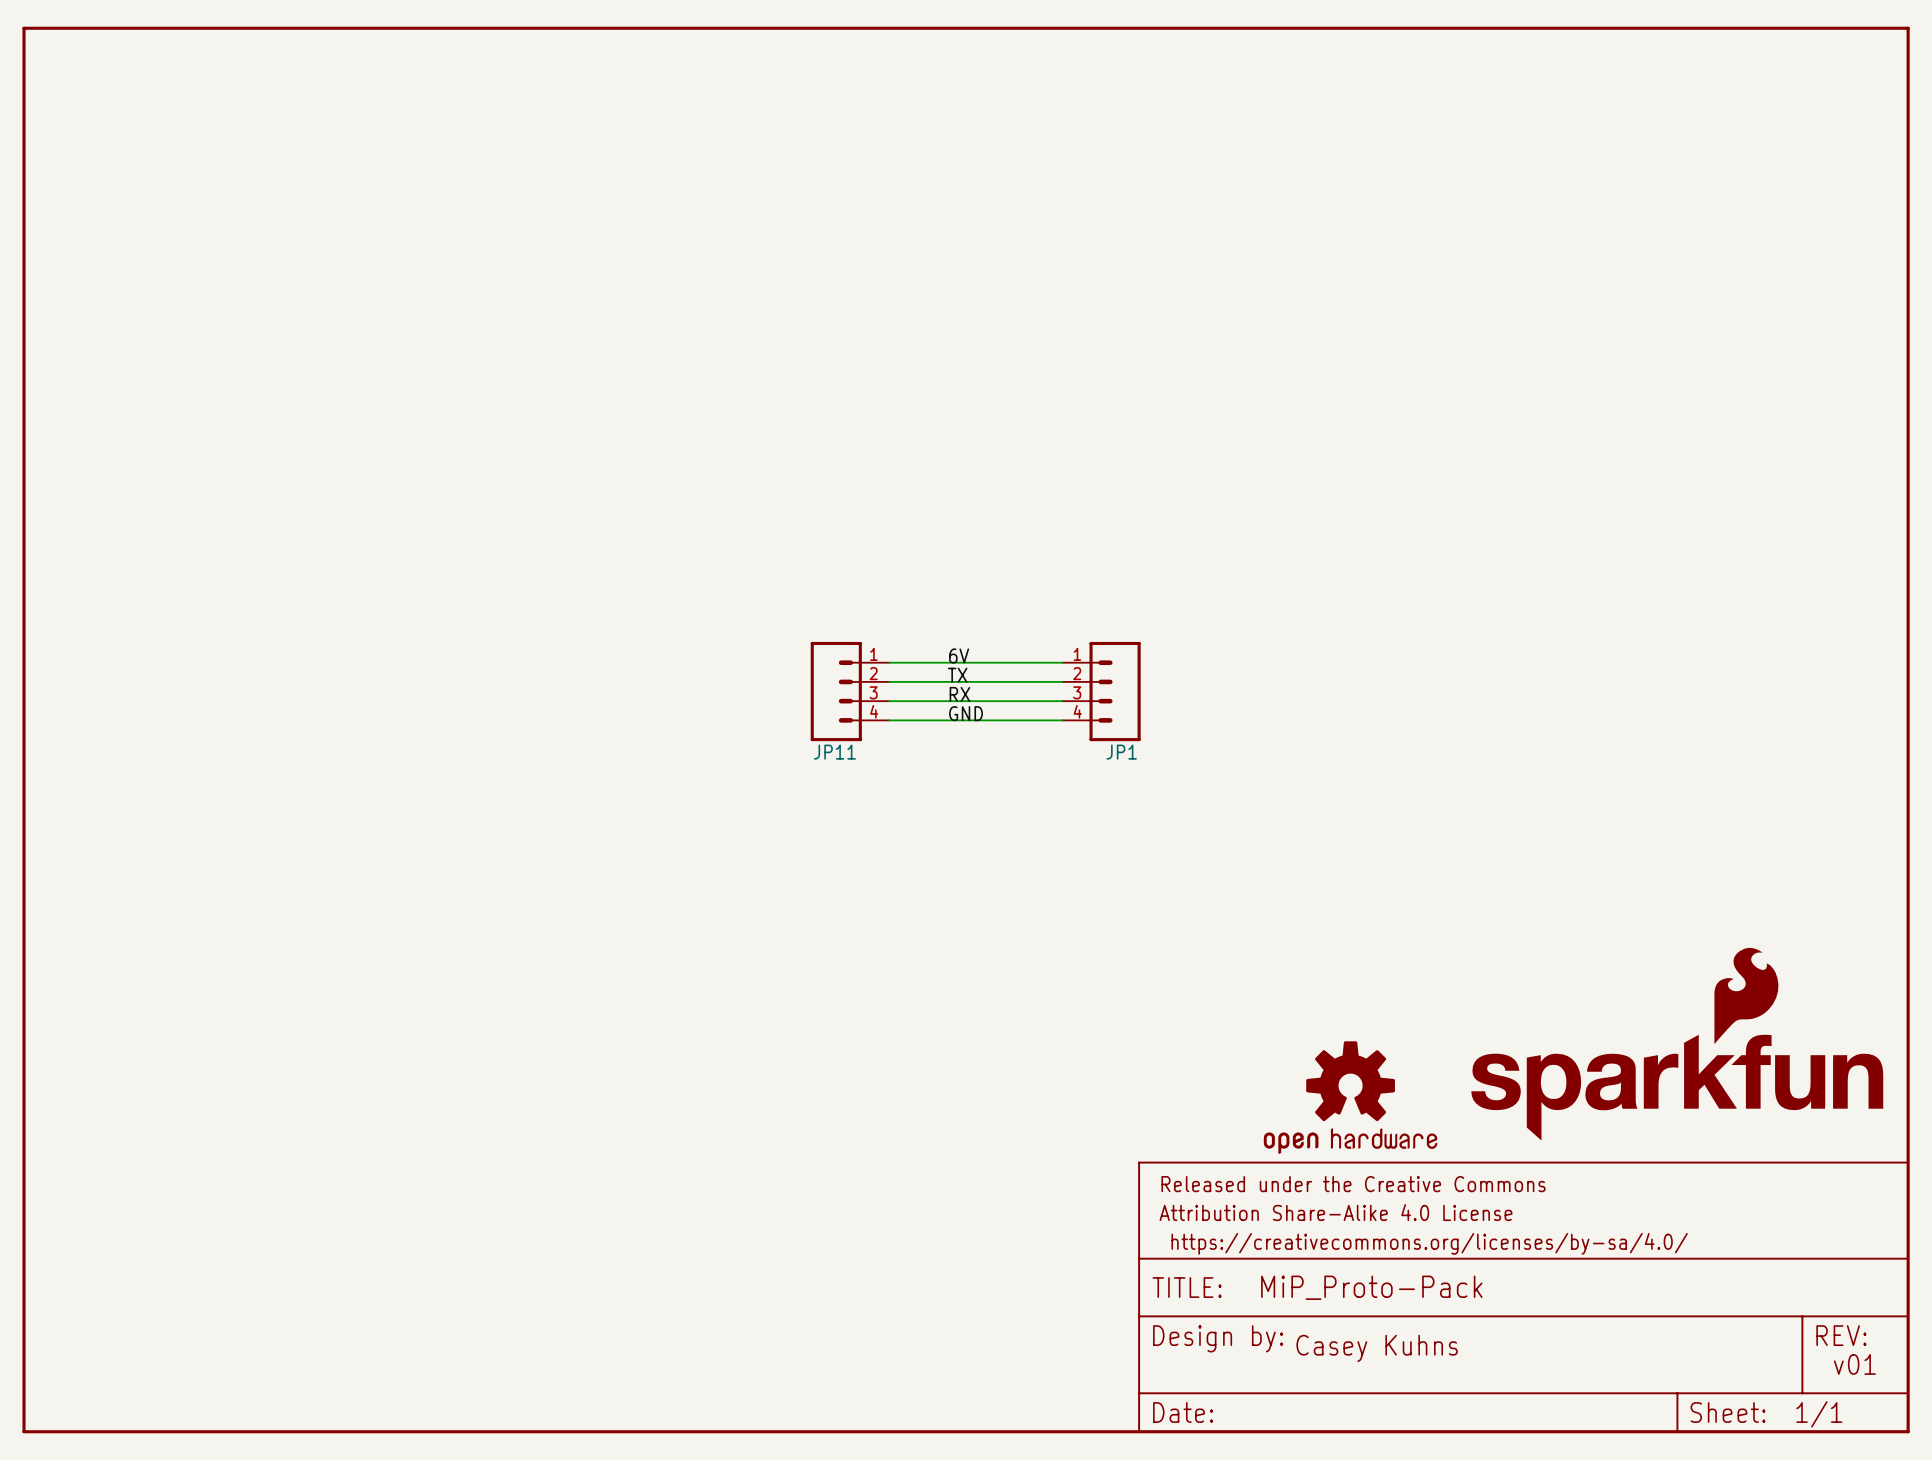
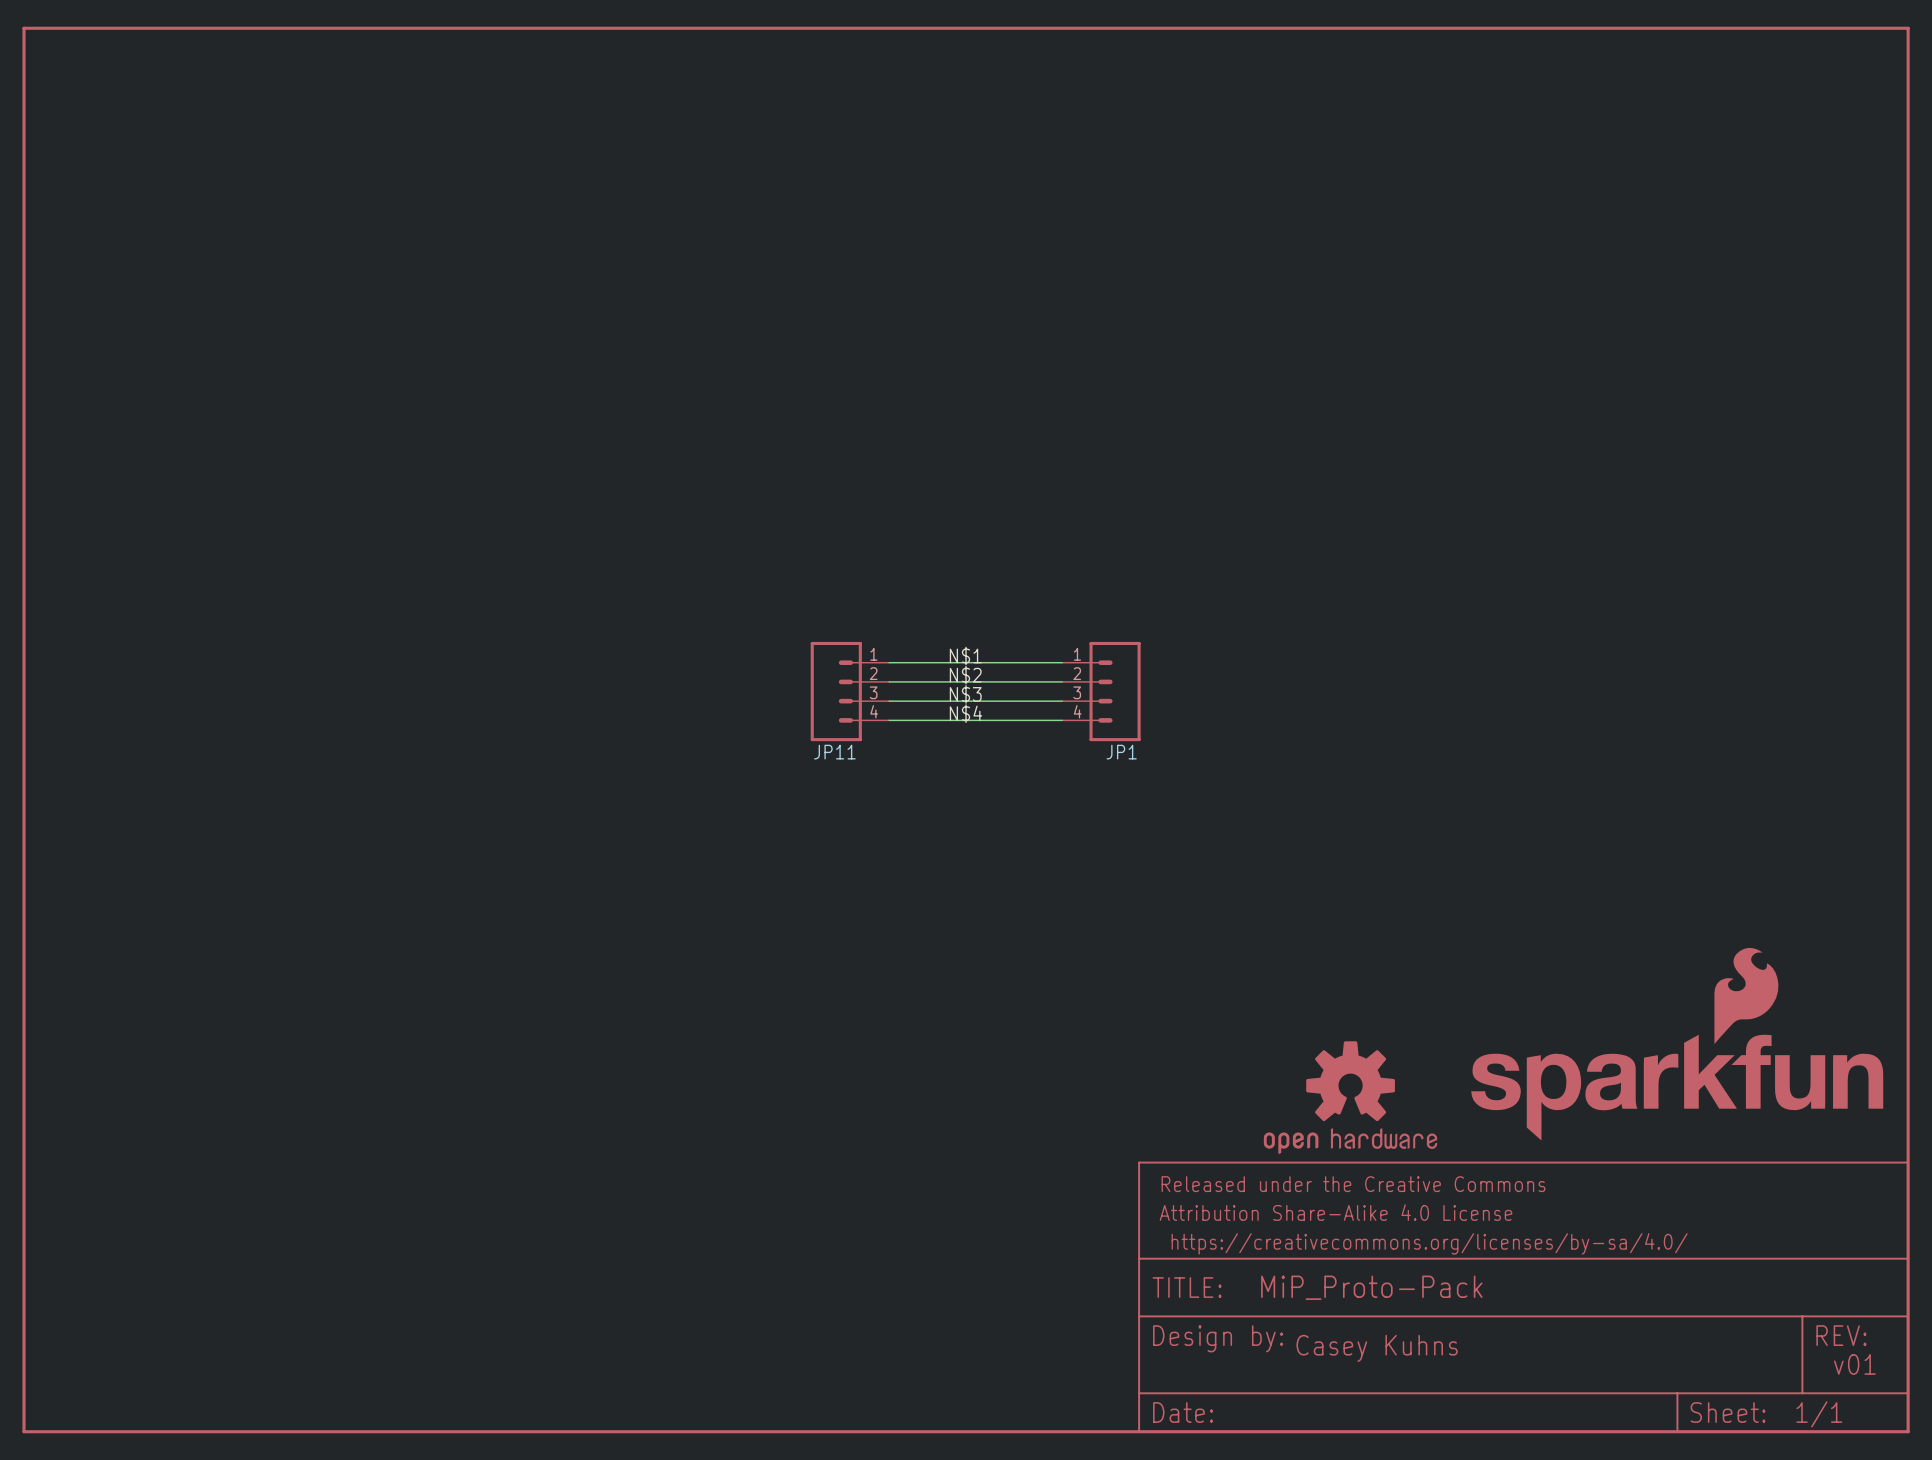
label: 6V (959, 655) -> N$1 (965, 655)
label: TX (957, 675) -> N$2 (965, 675)
label: RX (959, 694) -> N$3 (965, 694)
label: GND (966, 713) -> N$4 (966, 713)

